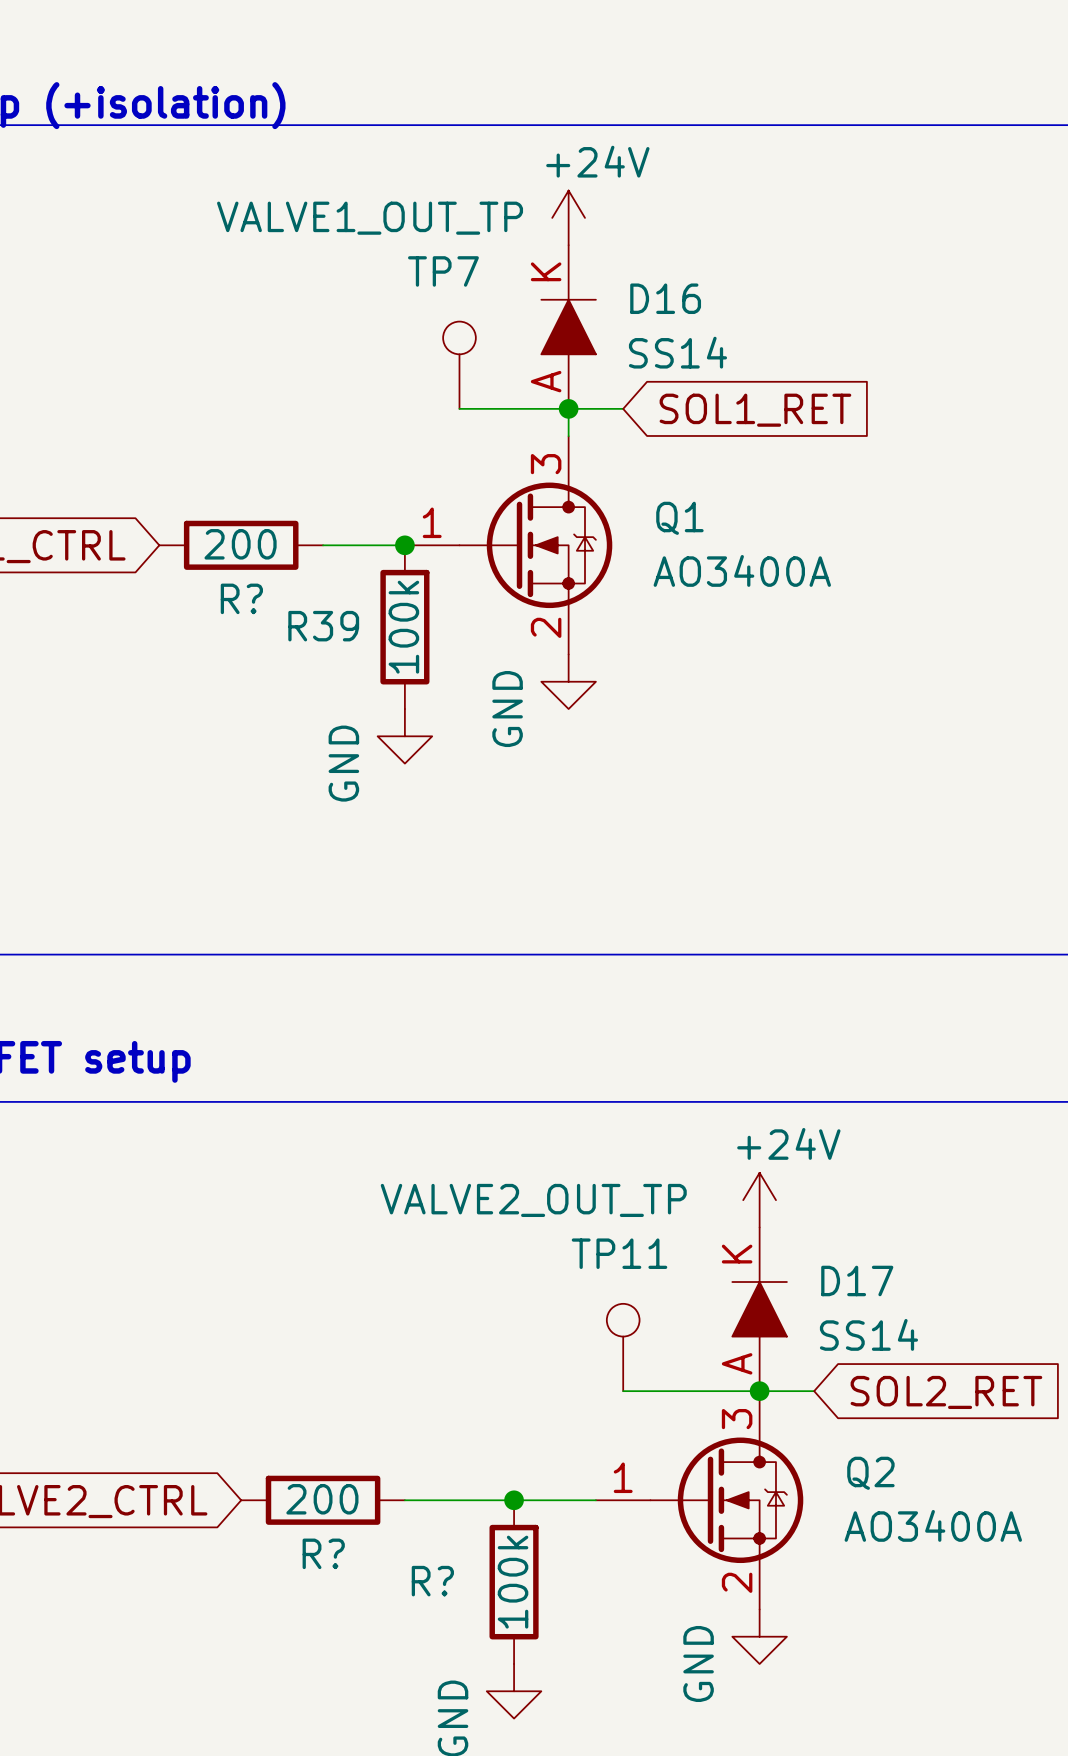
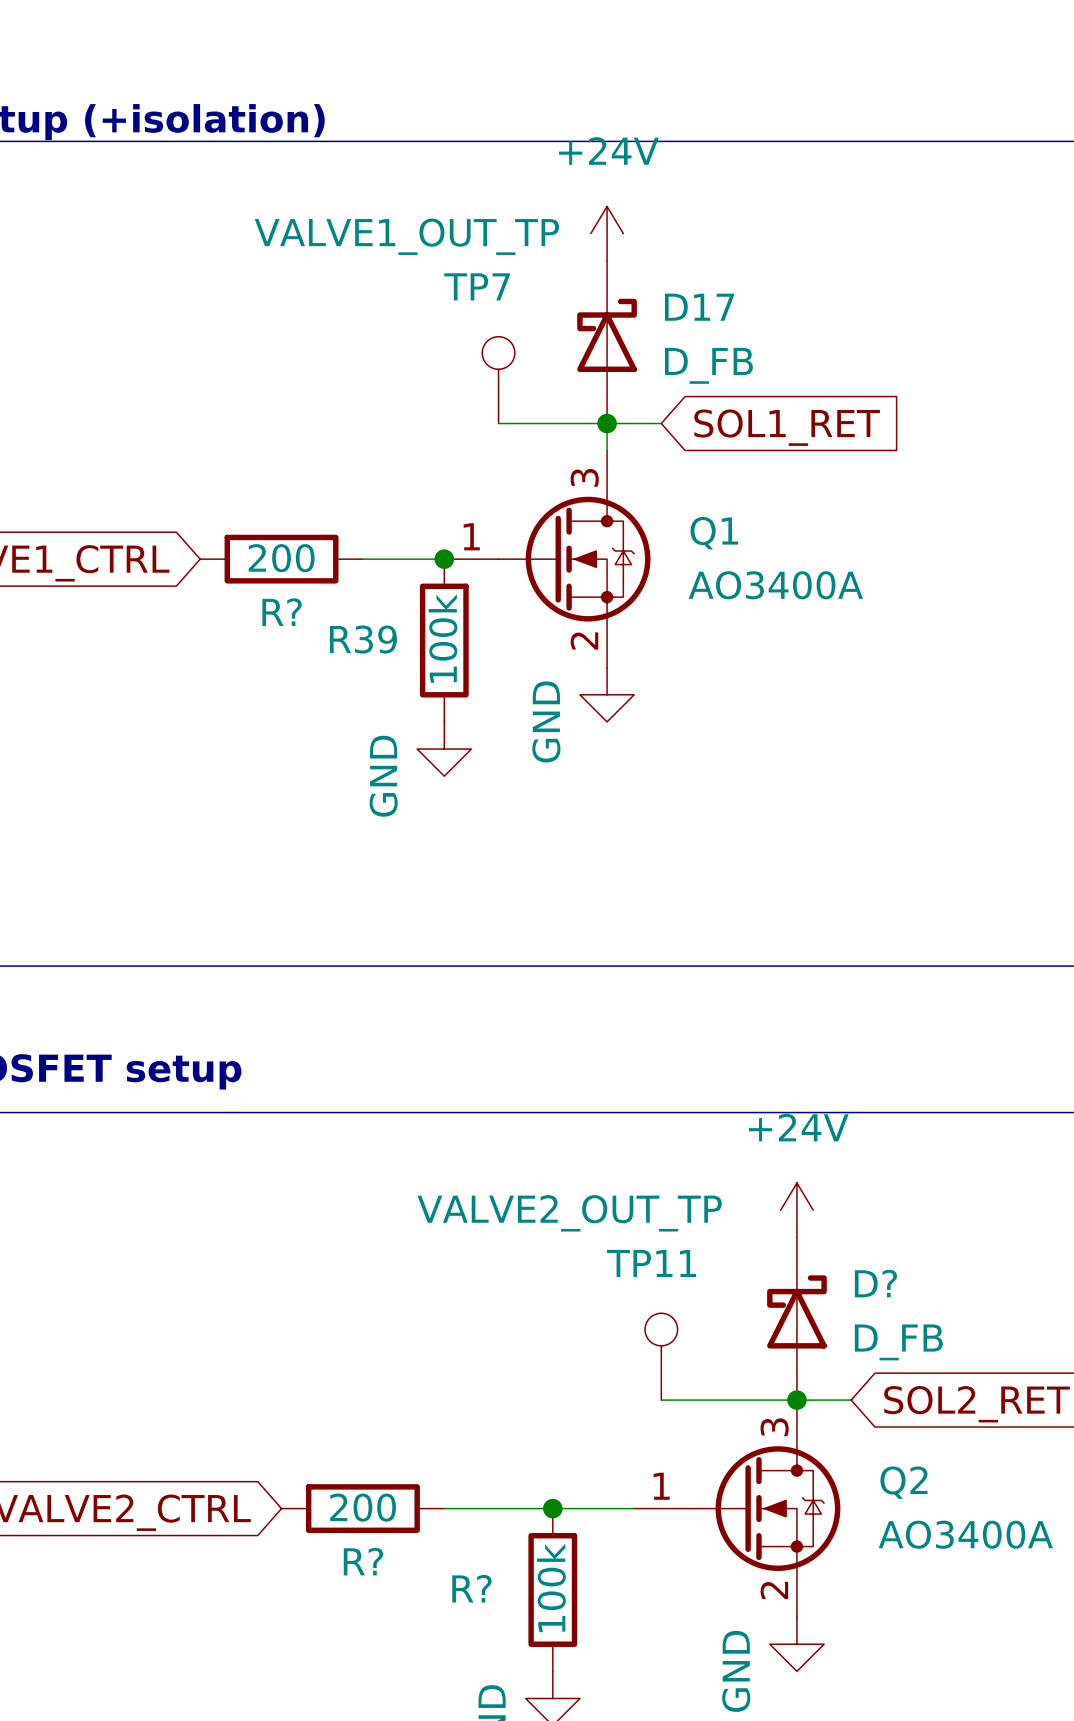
power symbol text position: +24V (597, 161) -> +24V (608, 150)
D16: SS14 (568, 327) -> none
power symbol text position: +24V (788, 1143) -> +24V (798, 1127)
D17 symbol: [732, 1227, 787, 1392] -> [577, 260, 637, 424]
D?: none -> D_FB (796, 1318)
D17 value: SS14 (868, 1334) -> D_FB (708, 365)

